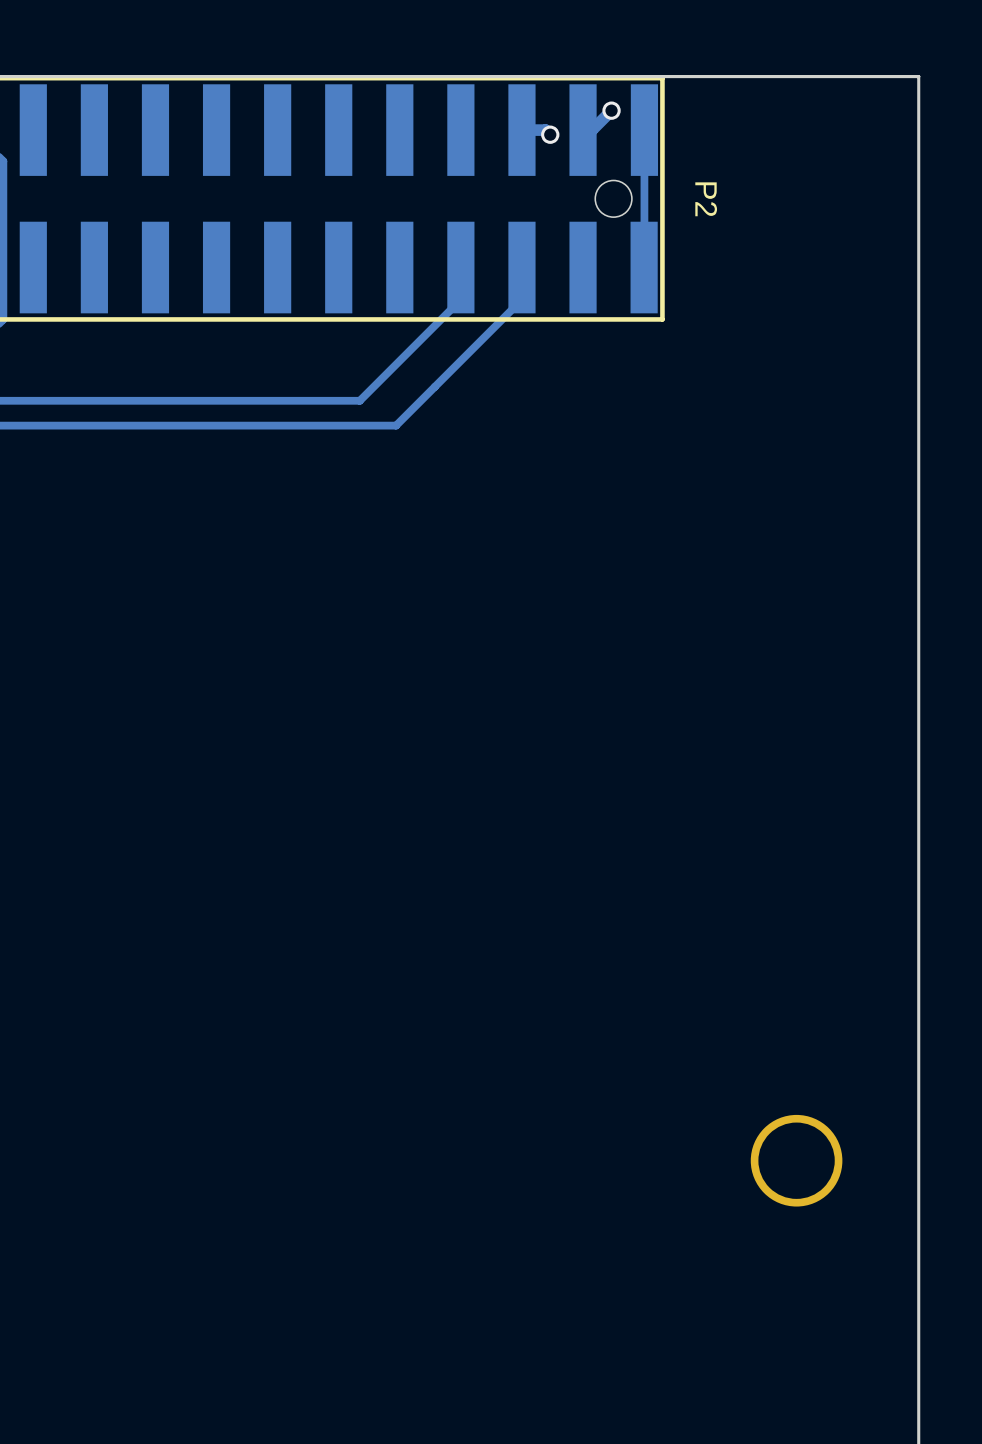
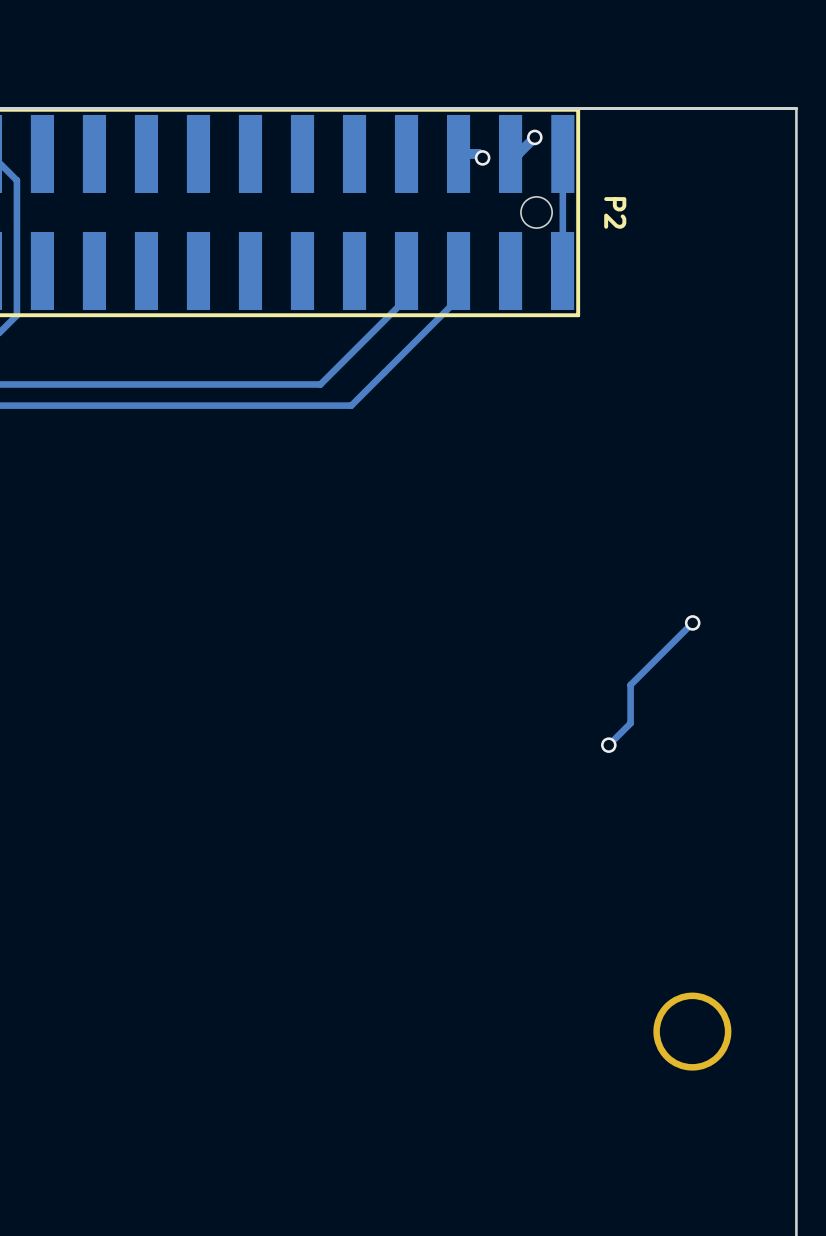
track: none -> (692, 622) (630, 685) (630, 723) (608, 745)
via: none -> (692, 622)
via: none -> (608, 745)

